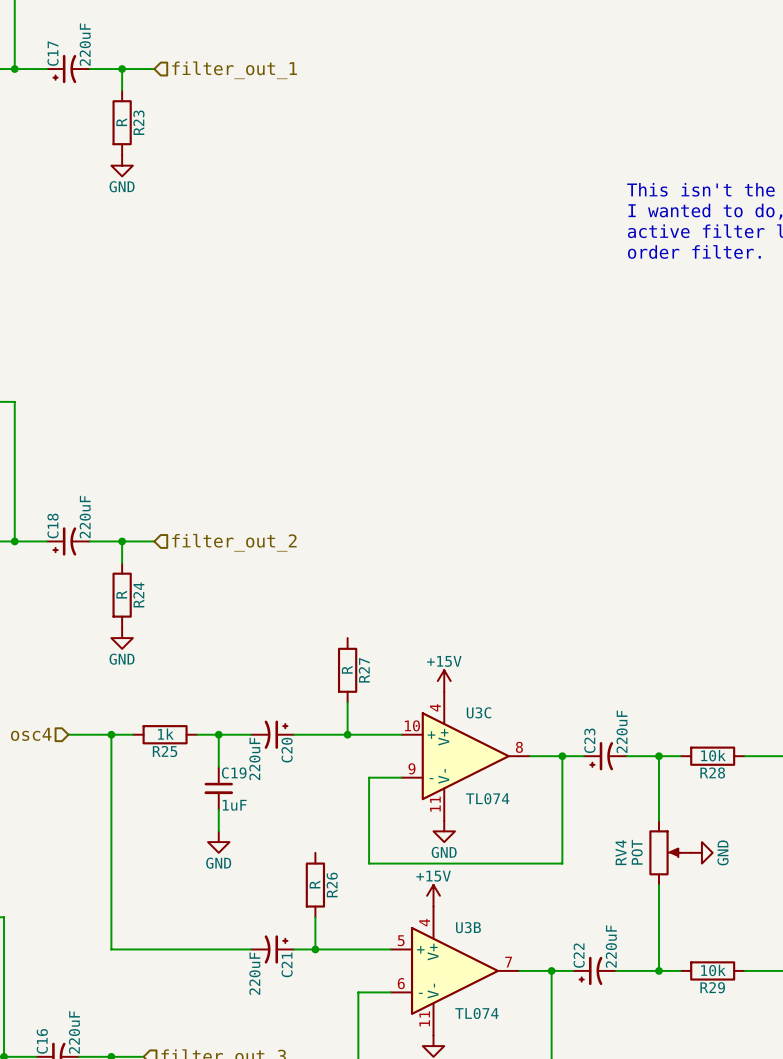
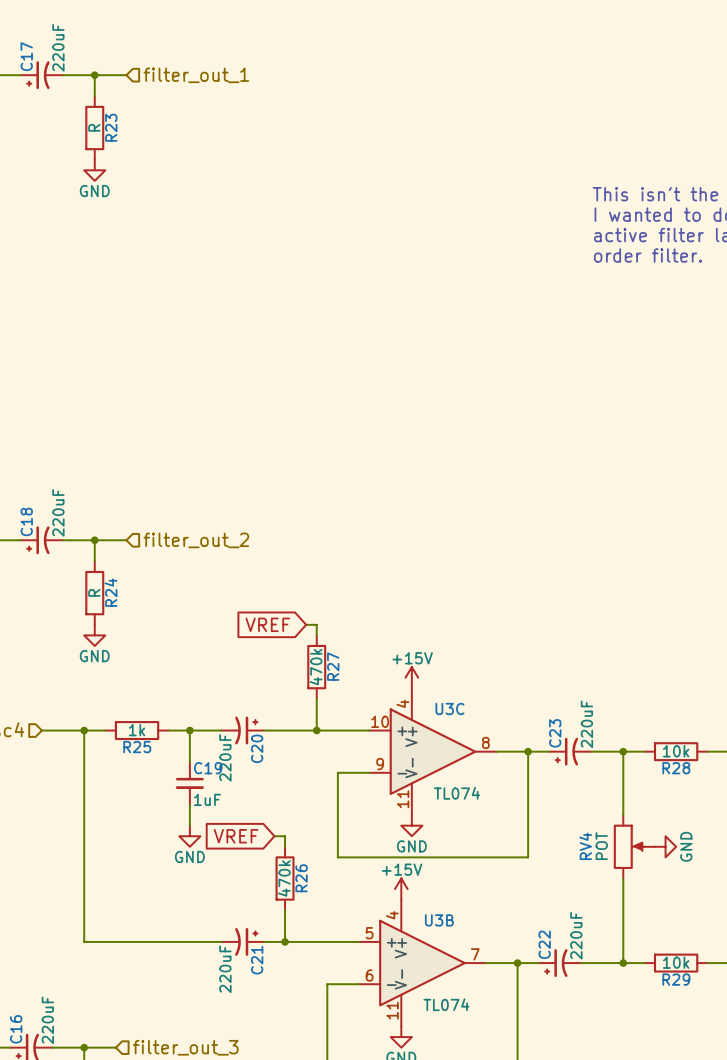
global label: none -> VREF (267, 624)
wire: none -> (306, 624) (316, 624) (316, 635)
R27 value: R (347, 669) -> 470k (316, 667)
global label: none -> VREF (236, 836)
wire: none -> (274, 836) (285, 836) (285, 846)
R26 value: R (315, 884) -> 470k (284, 878)

